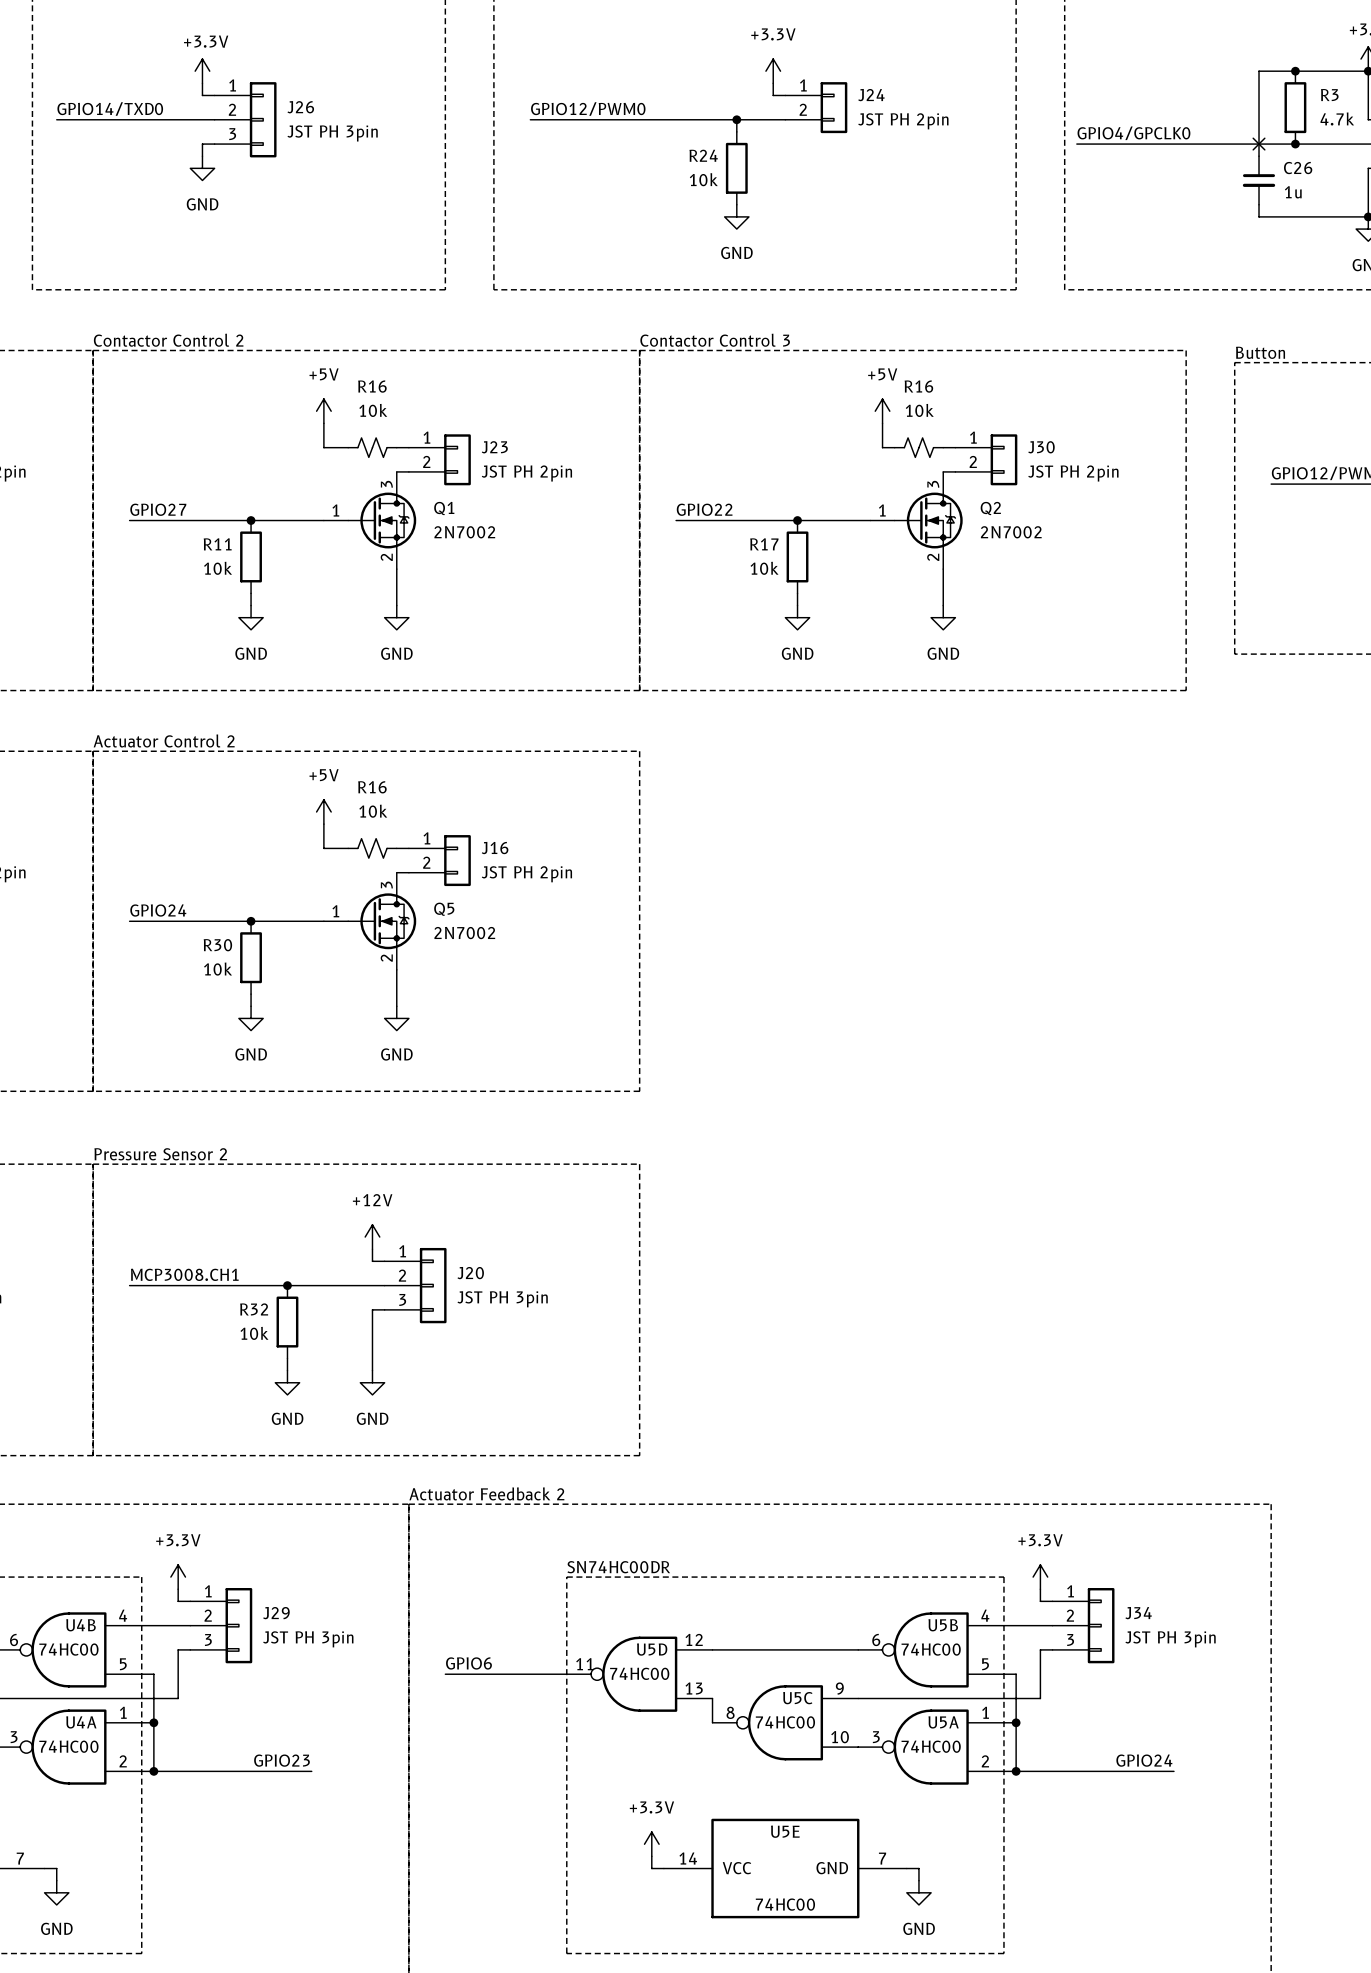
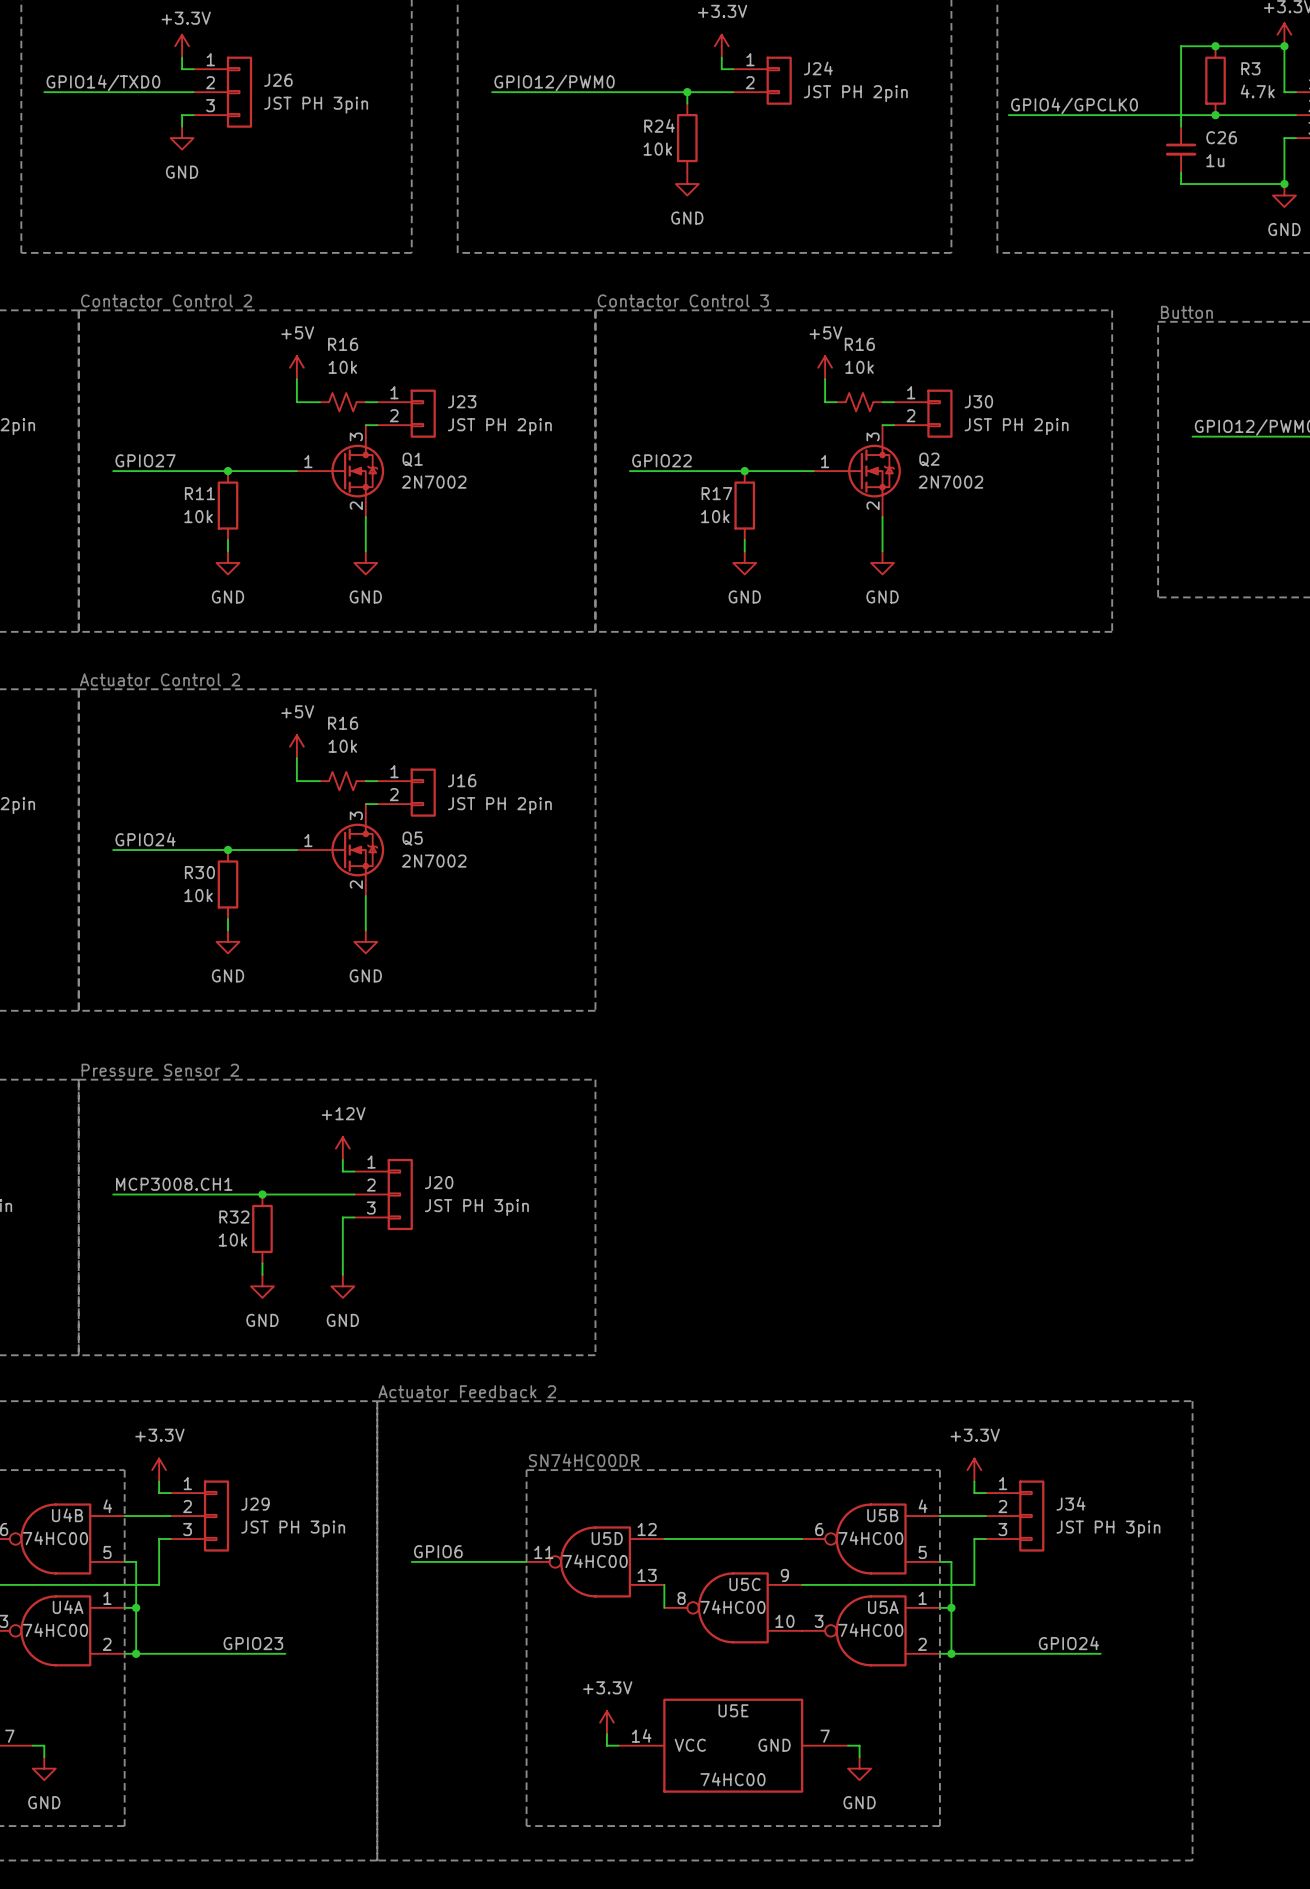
no-connect mark: (1259, 144) -> none

